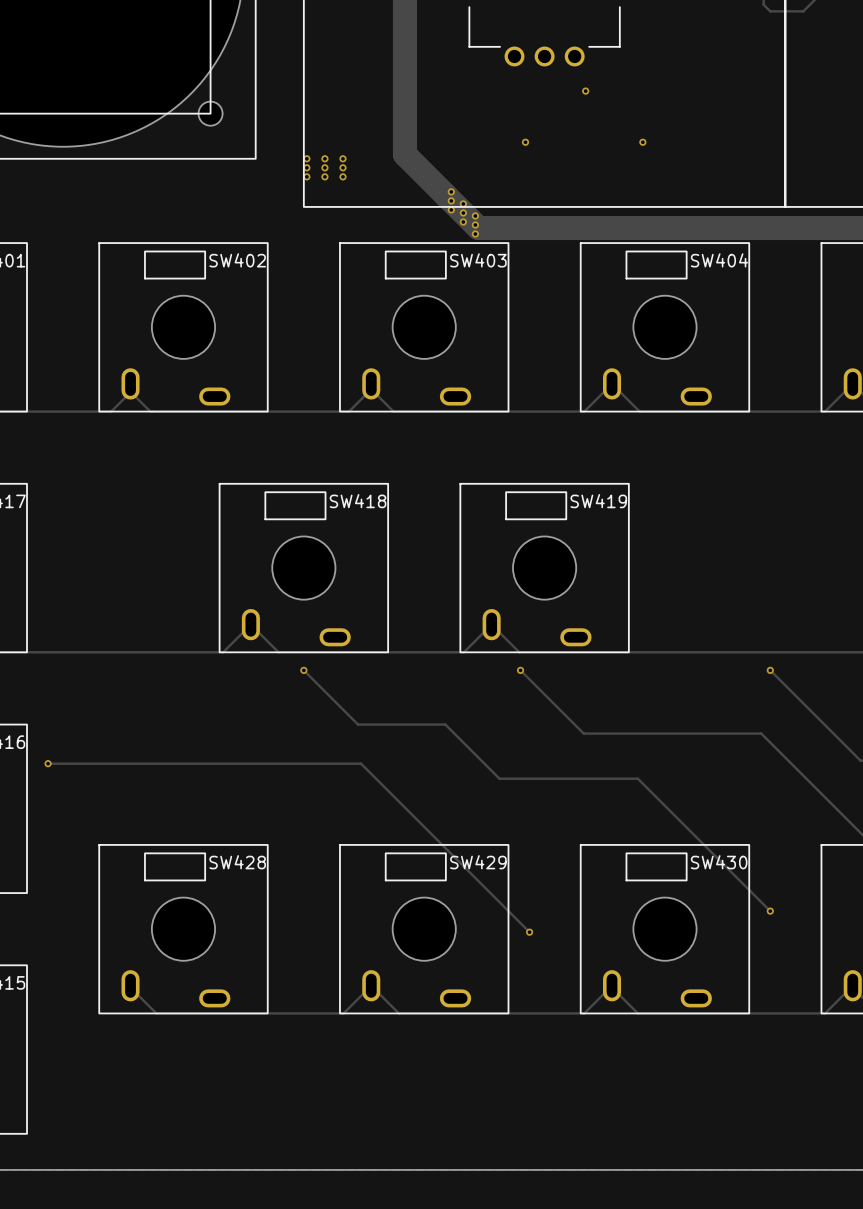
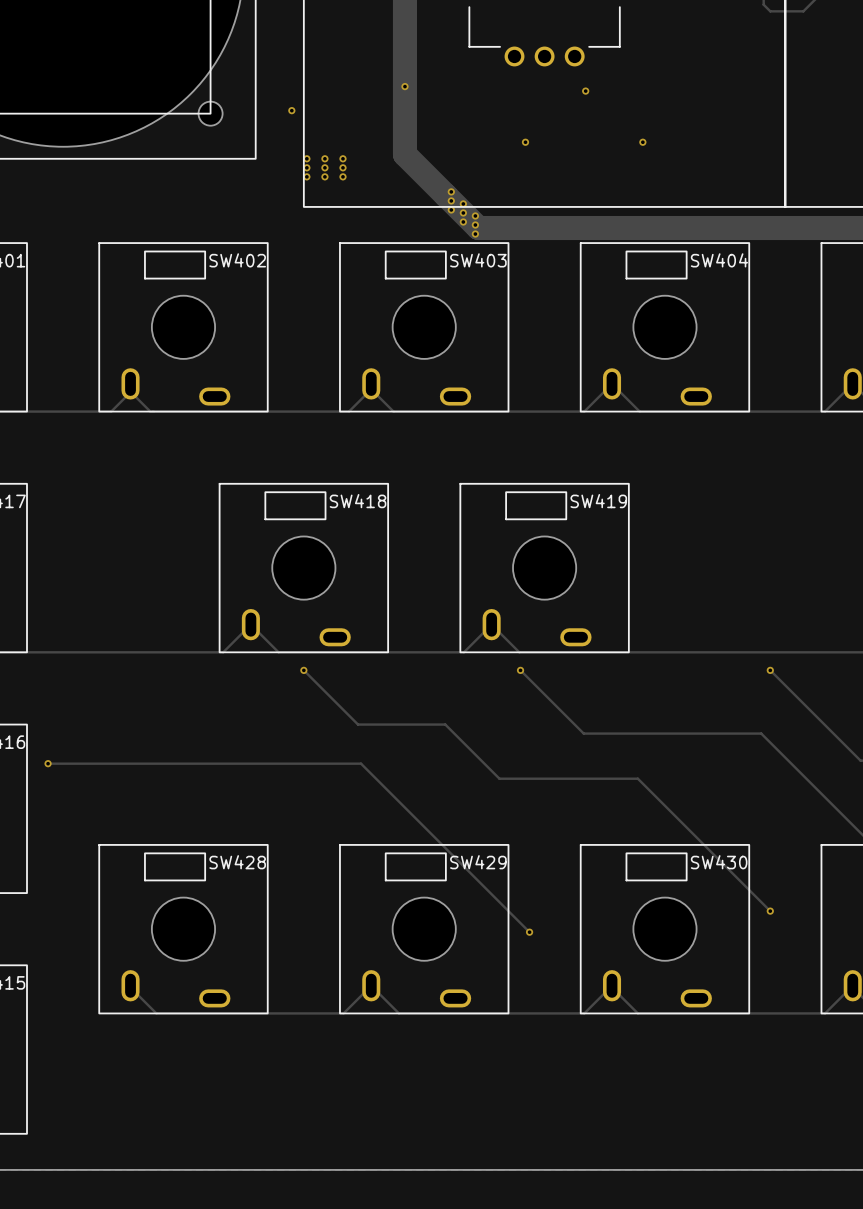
via: none -> (404, 86)
via: none -> (291, 110)

